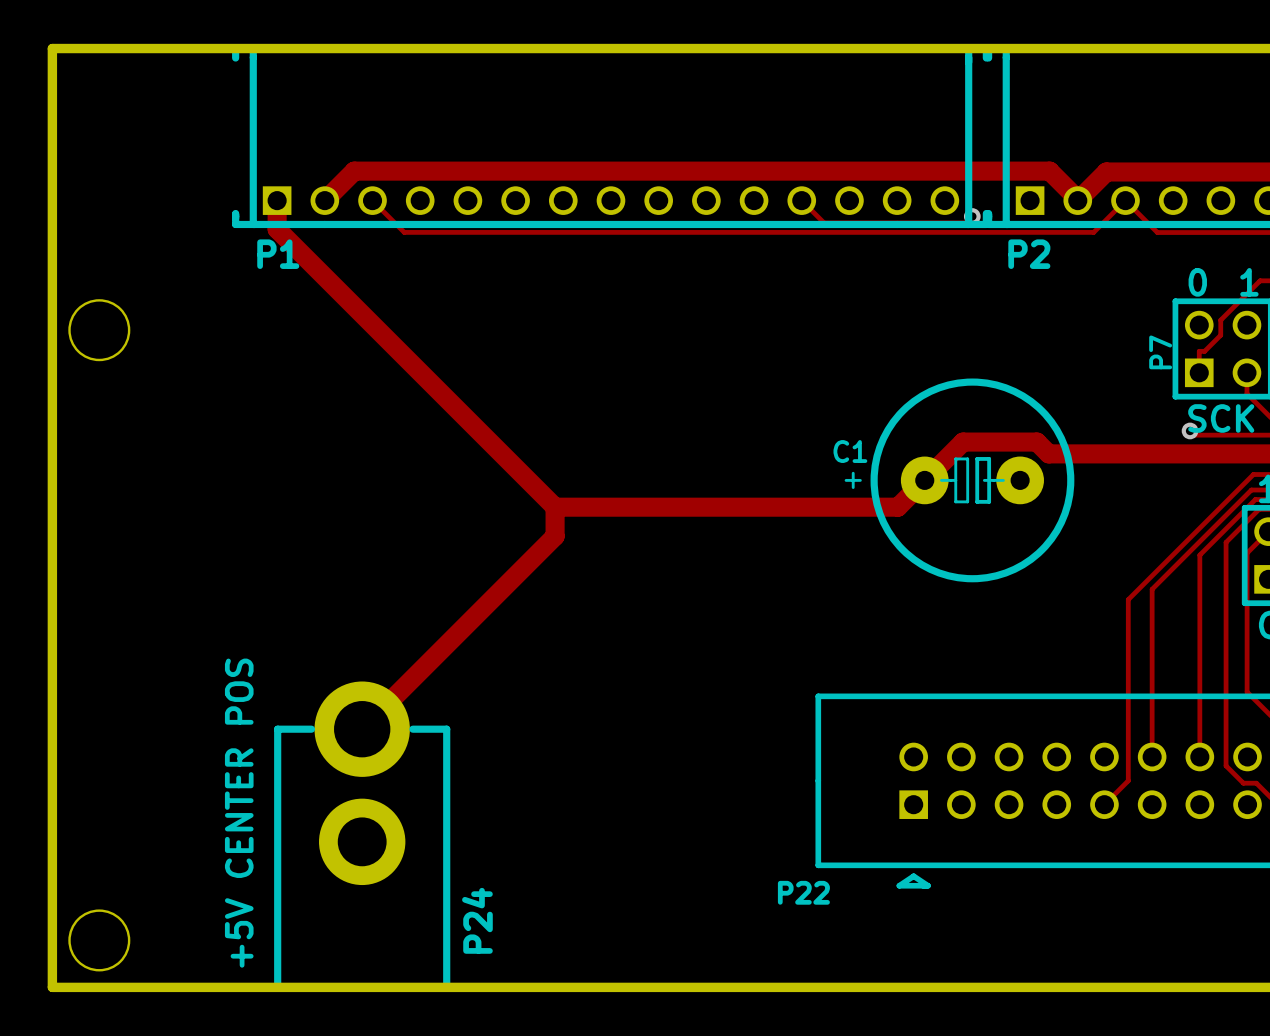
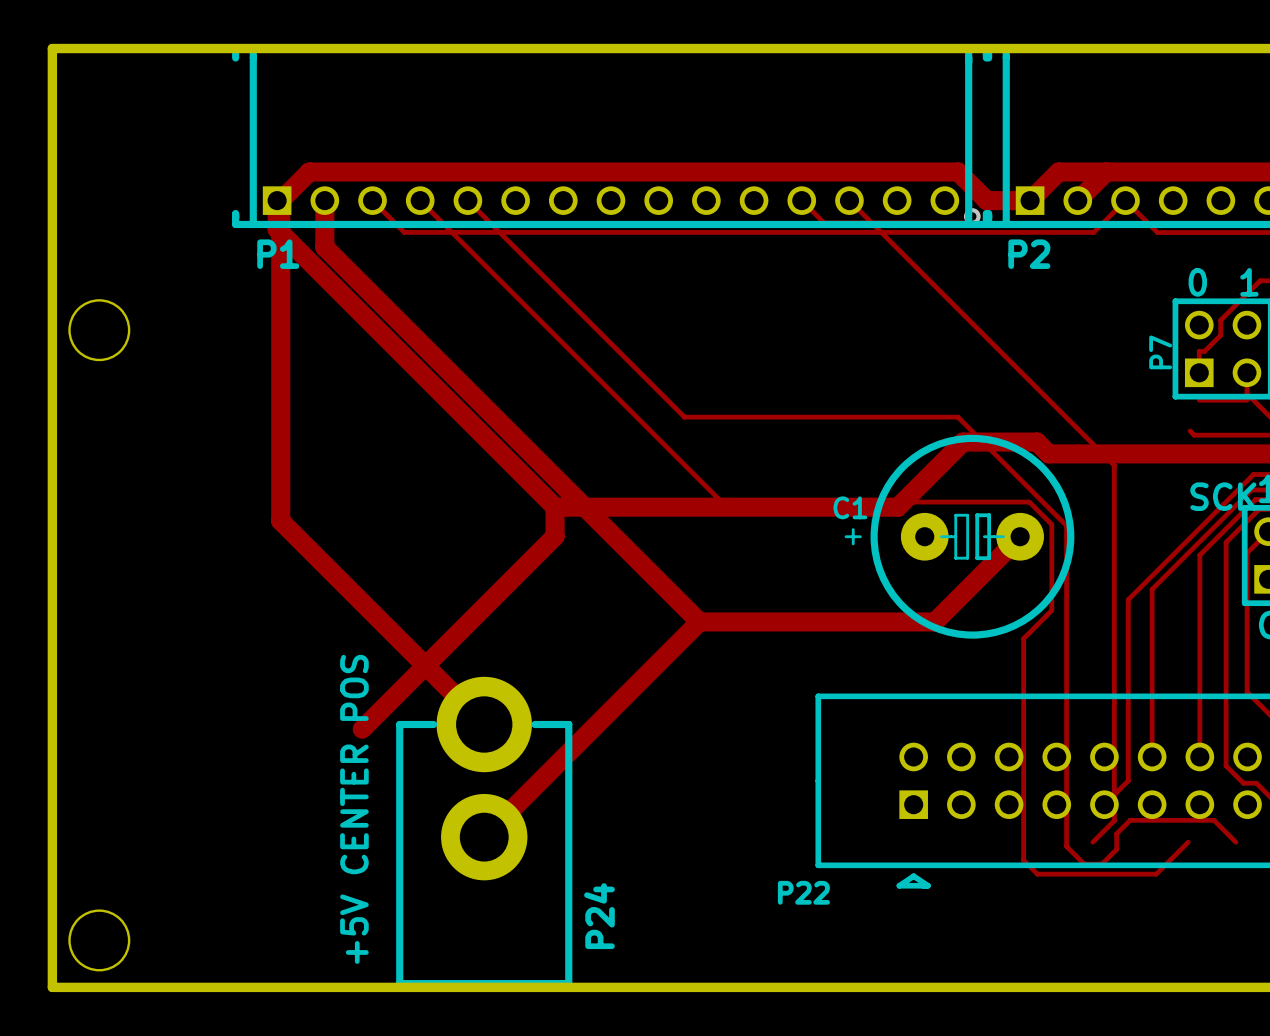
track: none -> (1106, 171) (1058, 172) (1030, 200) (986, 200) (958, 172) (309, 172) (280, 200) (280, 521) (484, 724)
track: (1078, 199) (1049, 171) (354, 171) (324, 200) -> (699, 621) (324, 247) (324, 200)
track: none -> (420, 200) (721, 502) (1029, 502) (1051, 524) (1051, 610) (1023, 638) (1023, 860) (1037, 874) (1156, 874) (1188, 842)
track: none -> (467, 200) (684, 417) (957, 417) (1066, 525) (1066, 846) (1084, 864) (1101, 864) (1116, 849) (1116, 833) (1130, 820) (1213, 820) (1235, 842)
track: none -> (849, 200) (1114, 465) (1114, 820) (1092, 842)
track: none -> (1199, 400) (1246, 400)
text position: SCK (1221, 418) -> SCK (1223, 496)
via: (1190, 430) -> none
C1 position: (959, 480) -> (959, 536)
track: none -> (1020, 536) (934, 621) (699, 621)
track: none -> (699, 621) (484, 837)
text position: +5V CENTER POS (239, 813) -> +5V CENTER POS (354, 809)
P24 position: (362, 836) -> (484, 832)

